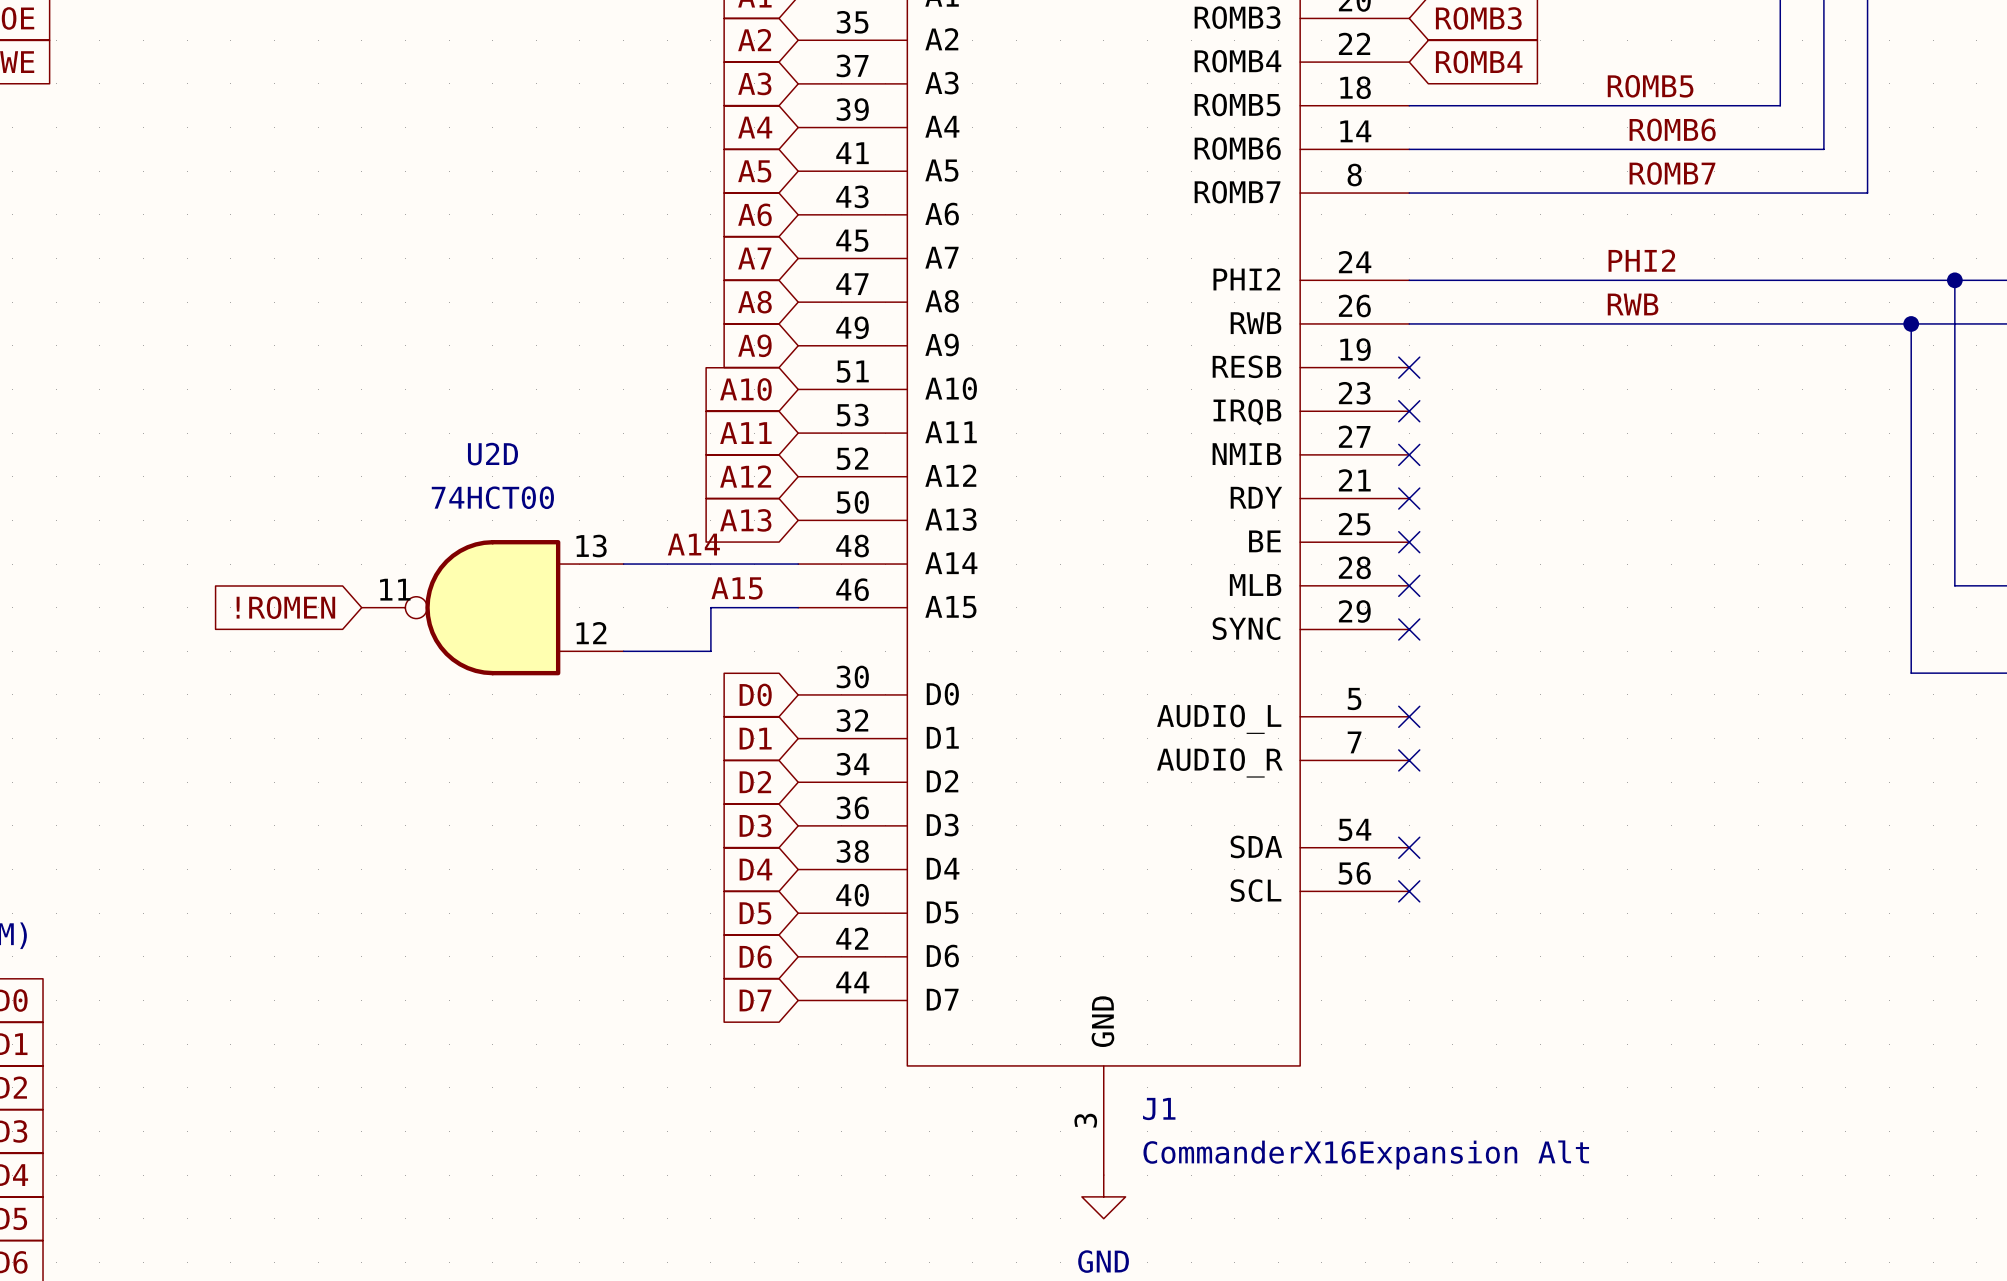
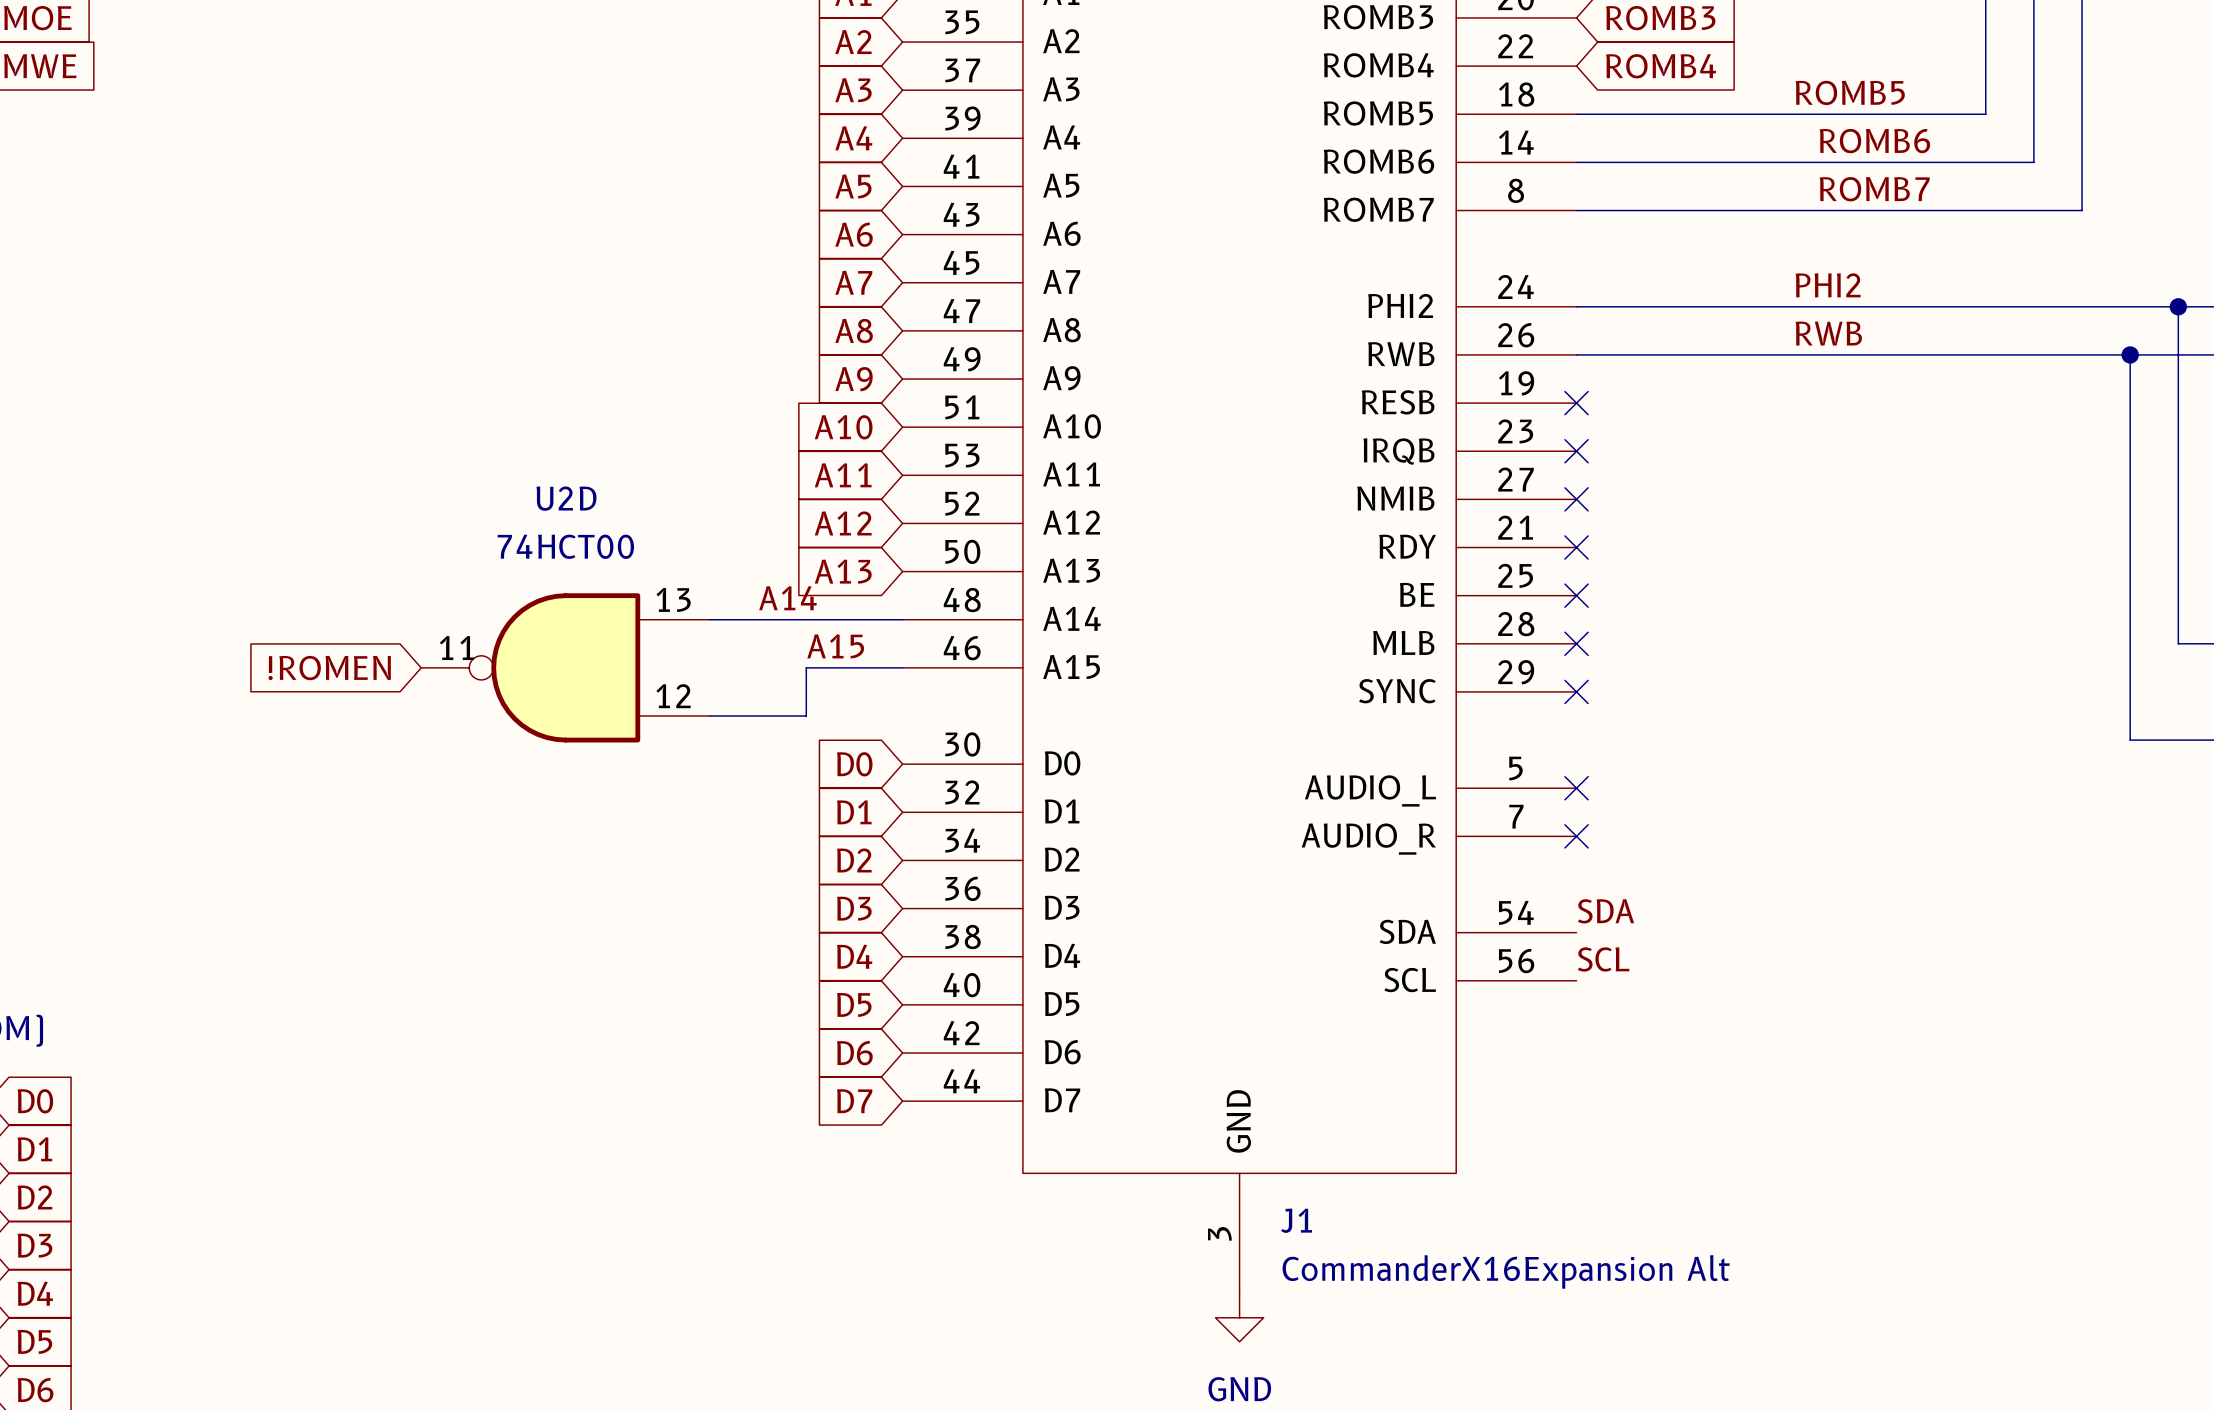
label: none -> SDA (1605, 911)
no-connect mark: (1409, 847) -> none
label: none -> SCL (1603, 959)
no-connect mark: (1409, 891) -> none

